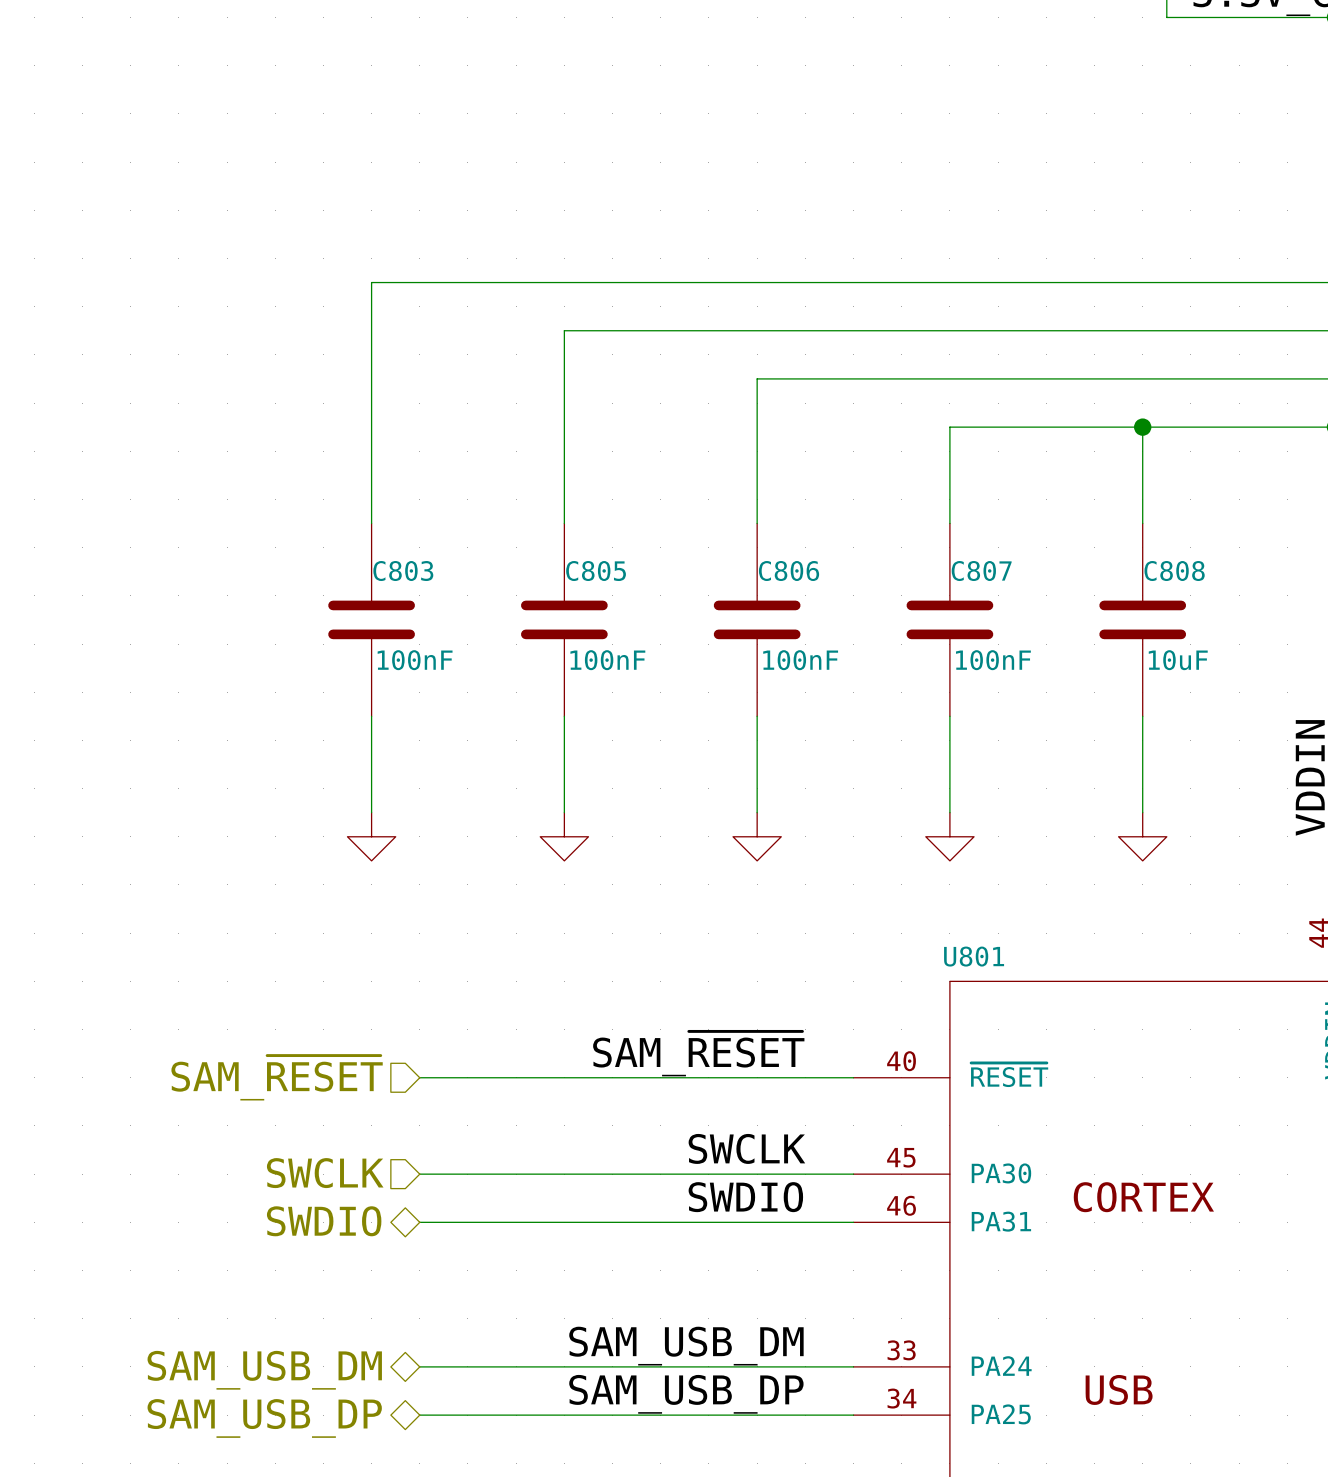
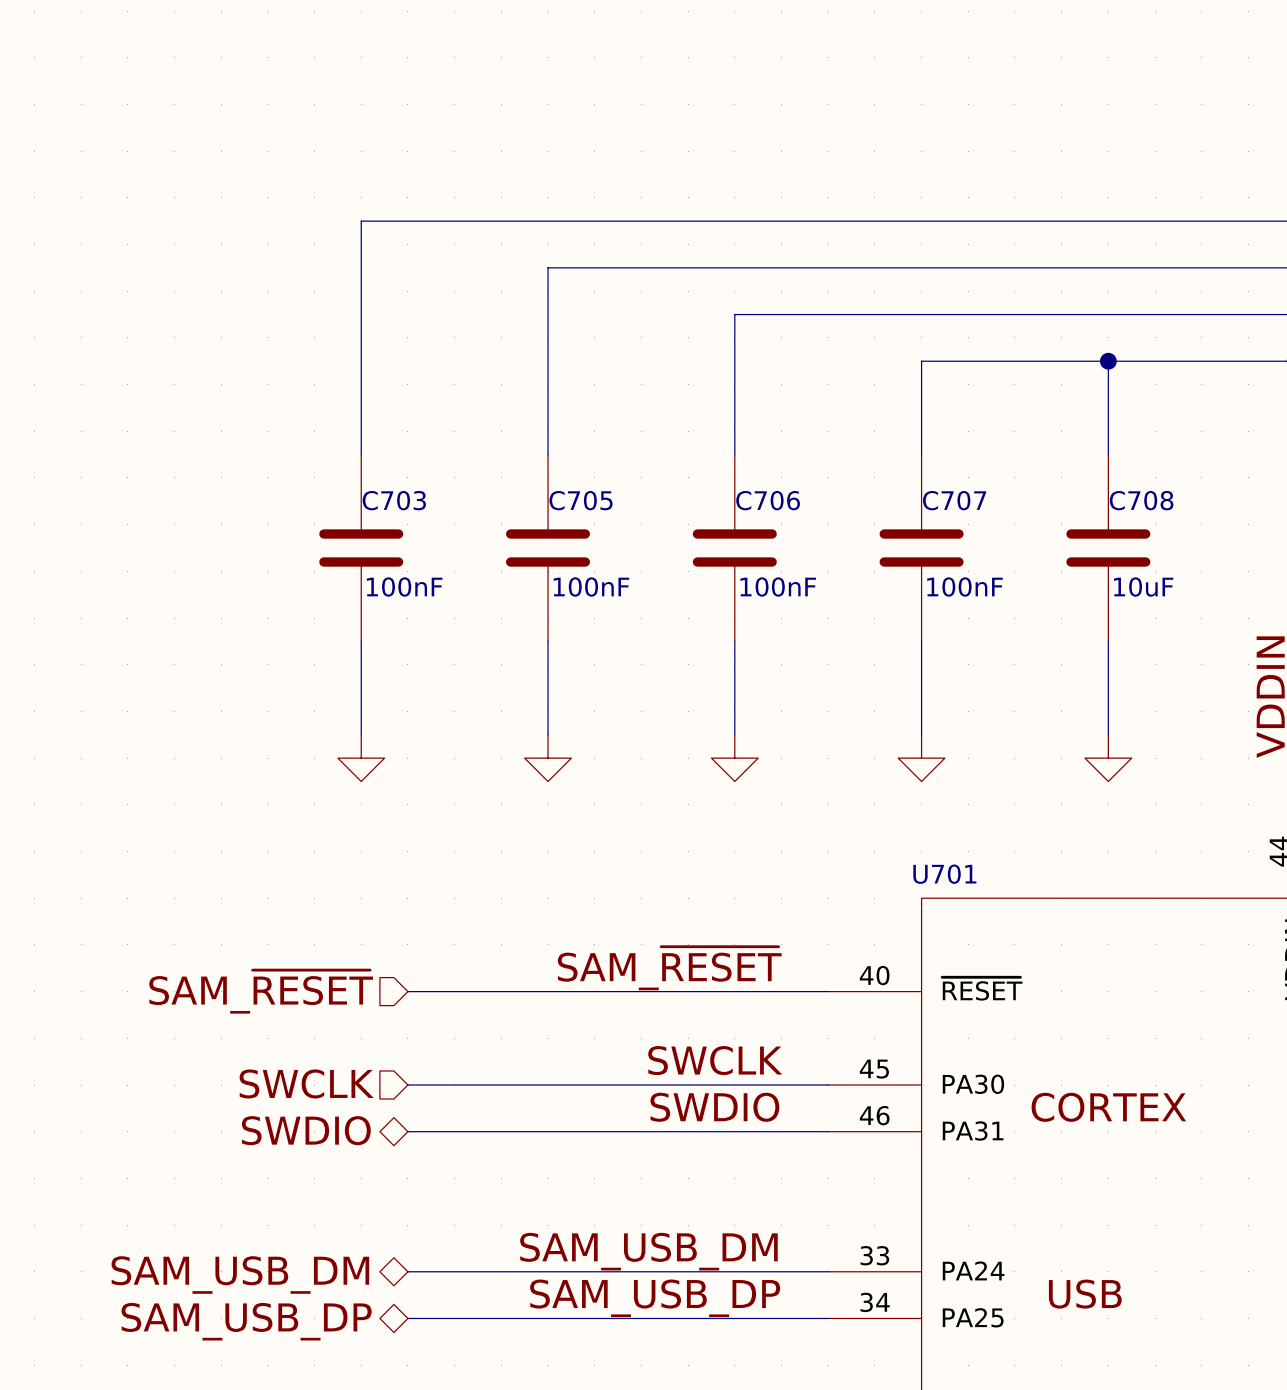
C803 name: C803 (403, 571) -> C703 (394, 500)
C805 name: C805 (596, 571) -> C705 (581, 500)
C806 name: C806 (789, 571) -> C706 (768, 500)
C807 name: C807 (981, 571) -> C707 (954, 500)
C808 name: C808 (1174, 571) -> C708 (1141, 500)
U801 name: U801 (974, 956) -> U701 (944, 874)

